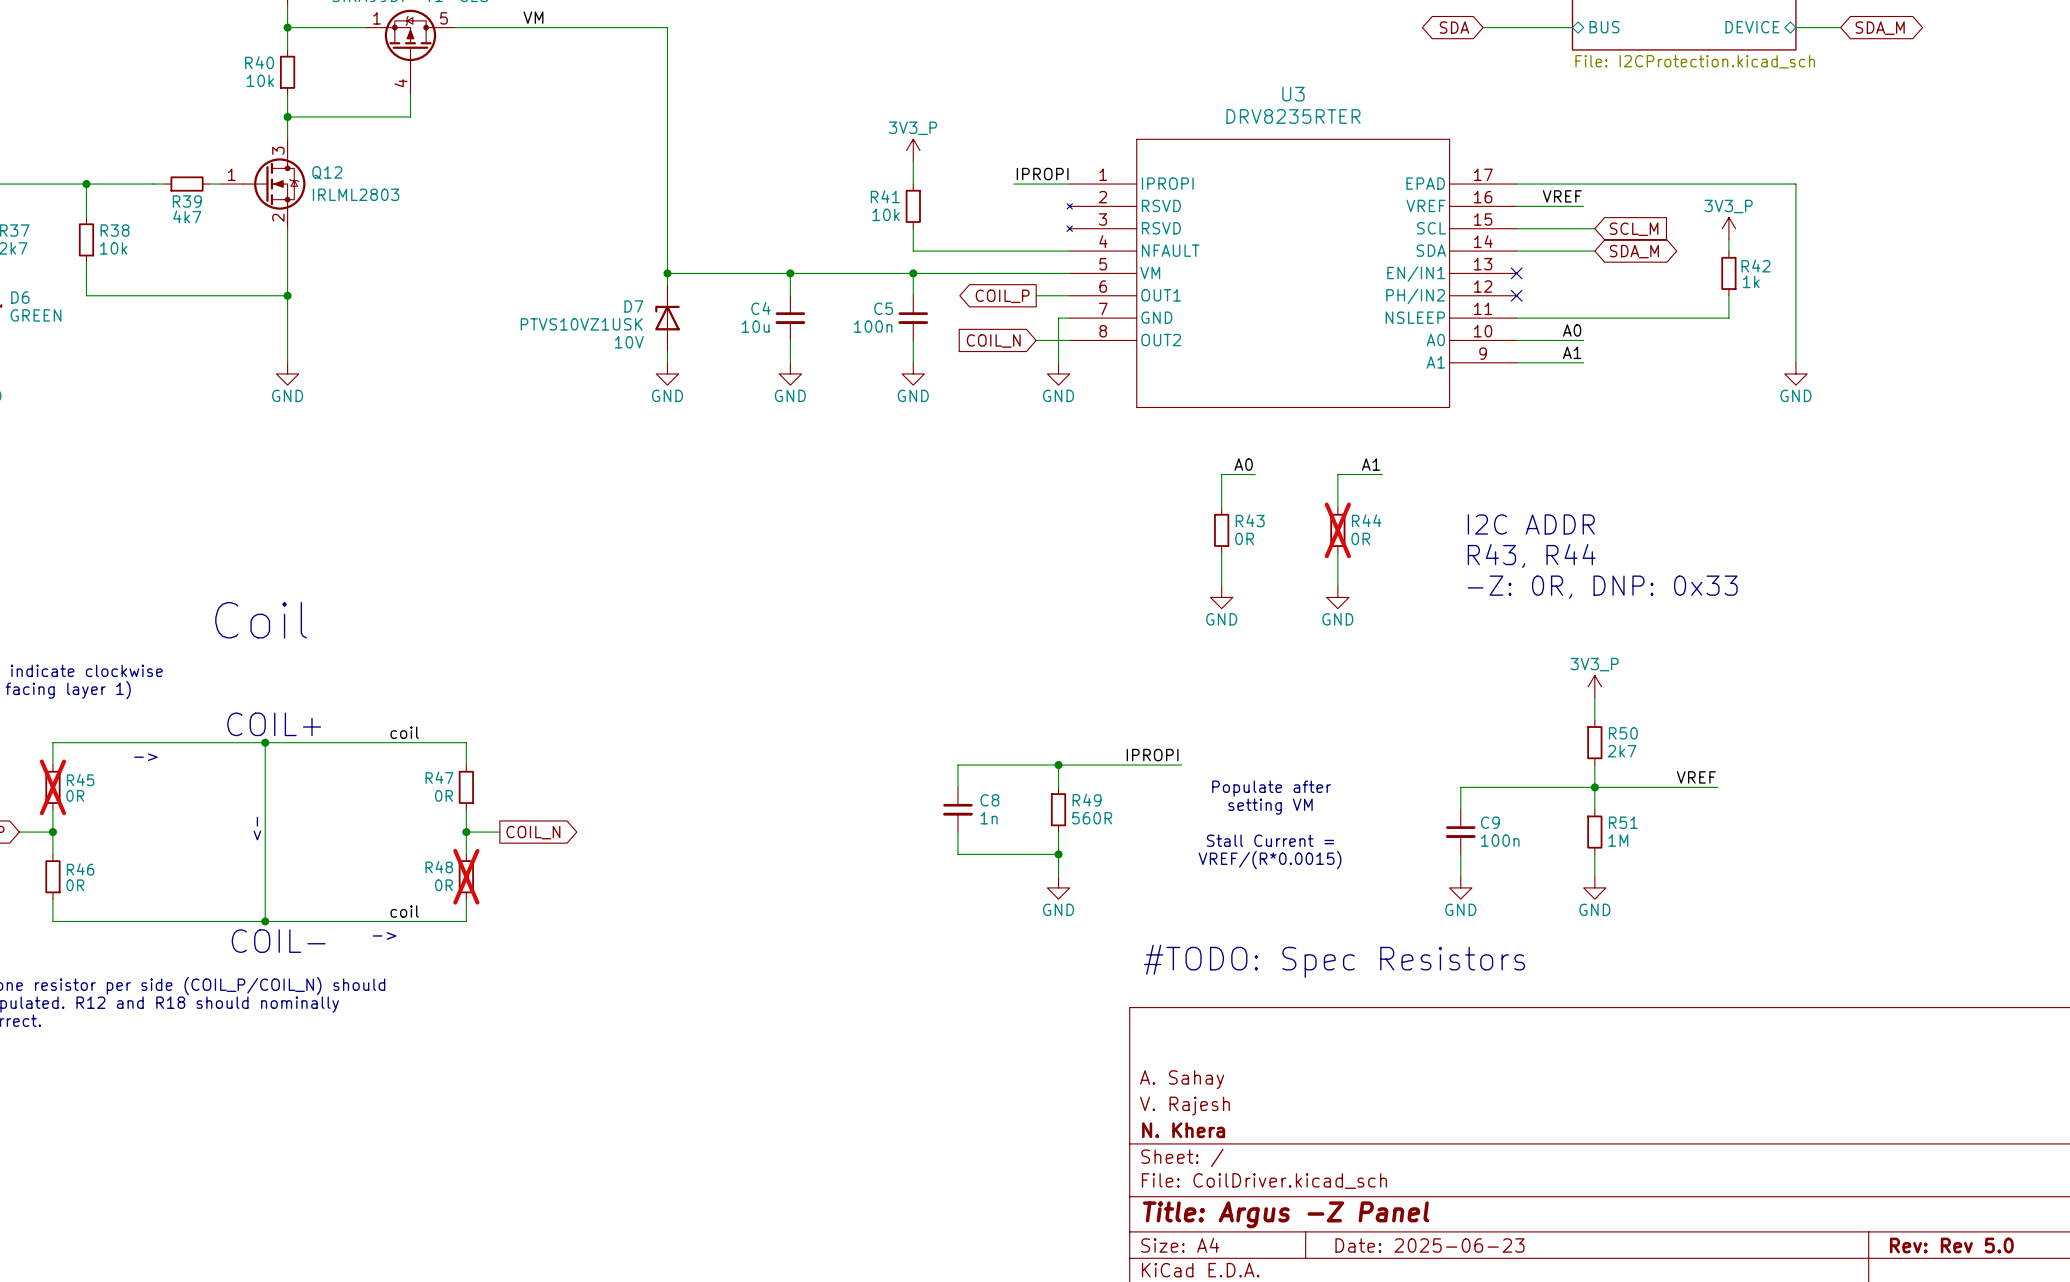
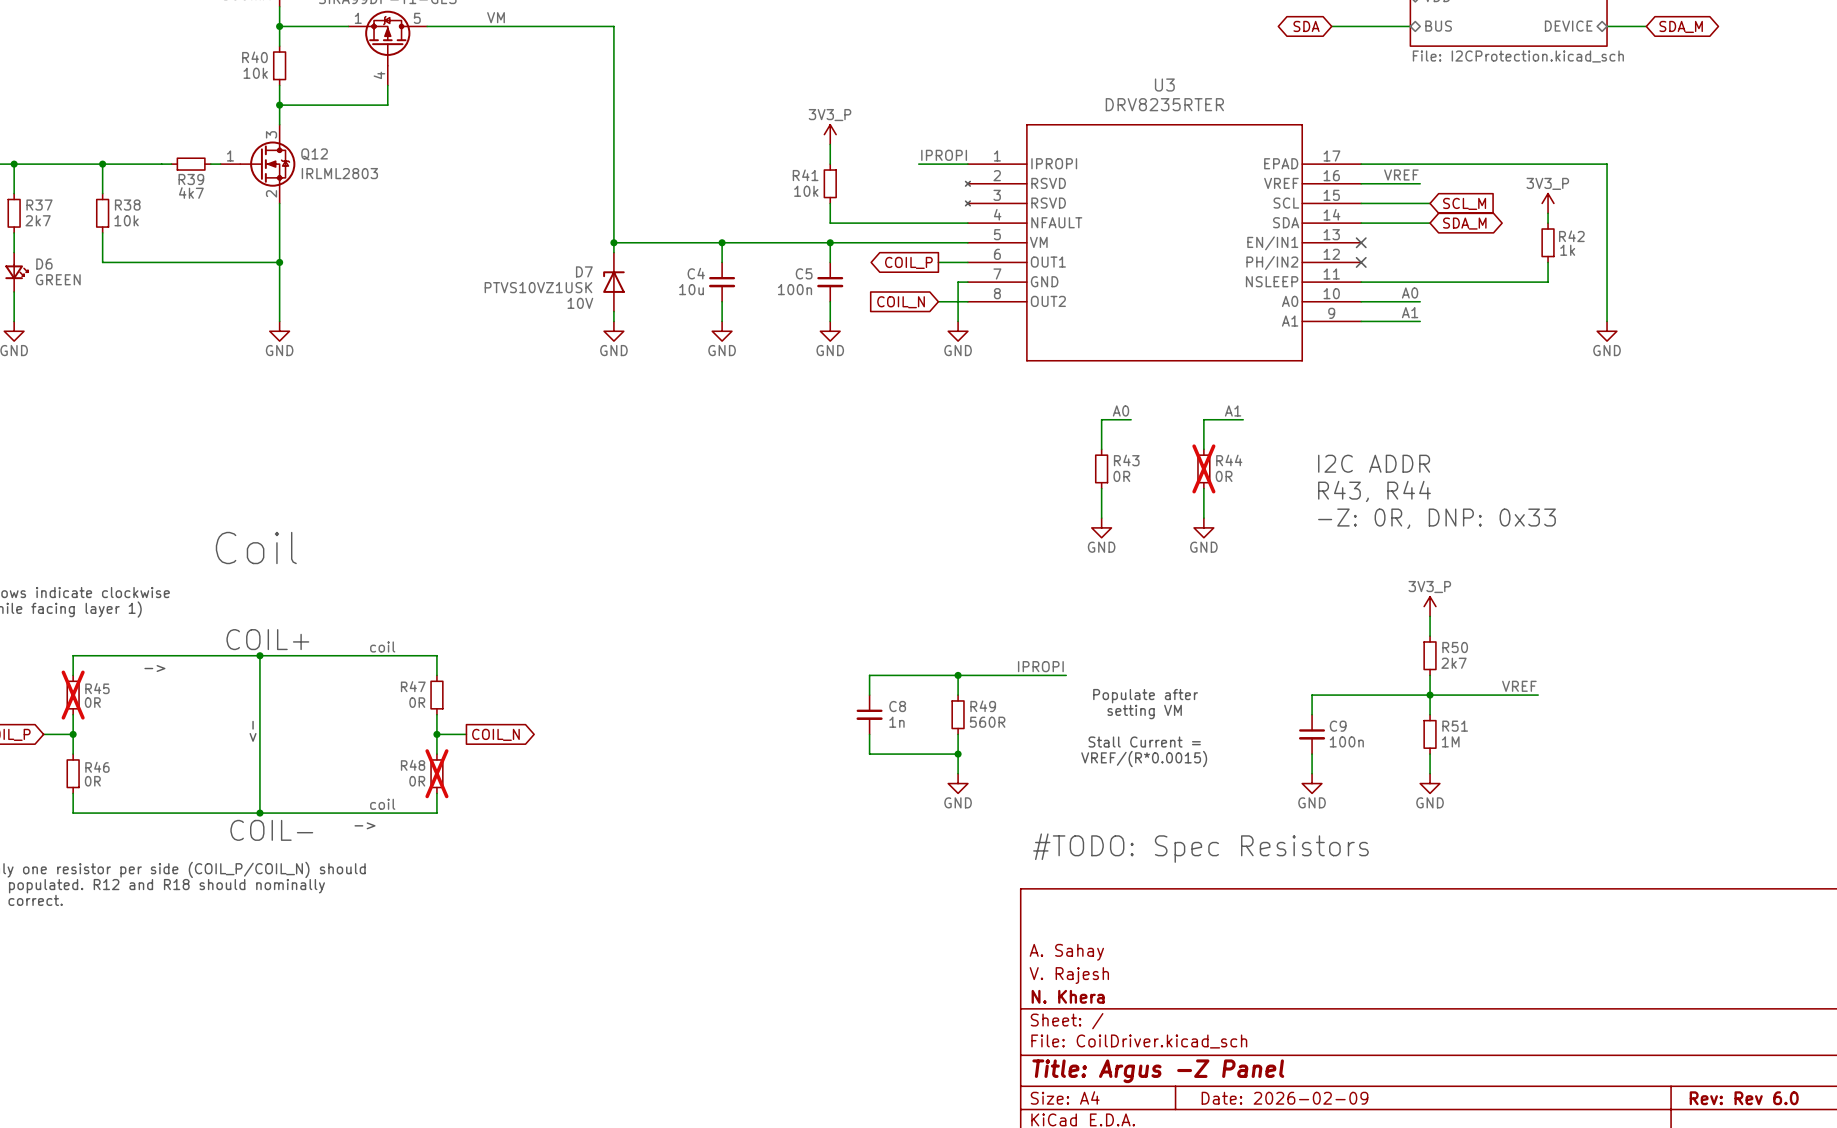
title block: Date: 2025-06-23 (1430, 1245) -> Date: 2026-02-09 (1284, 1098)
title block: Rev: Rev 5.0 (1951, 1245) -> Rev: Rev 6.0 (1744, 1098)

